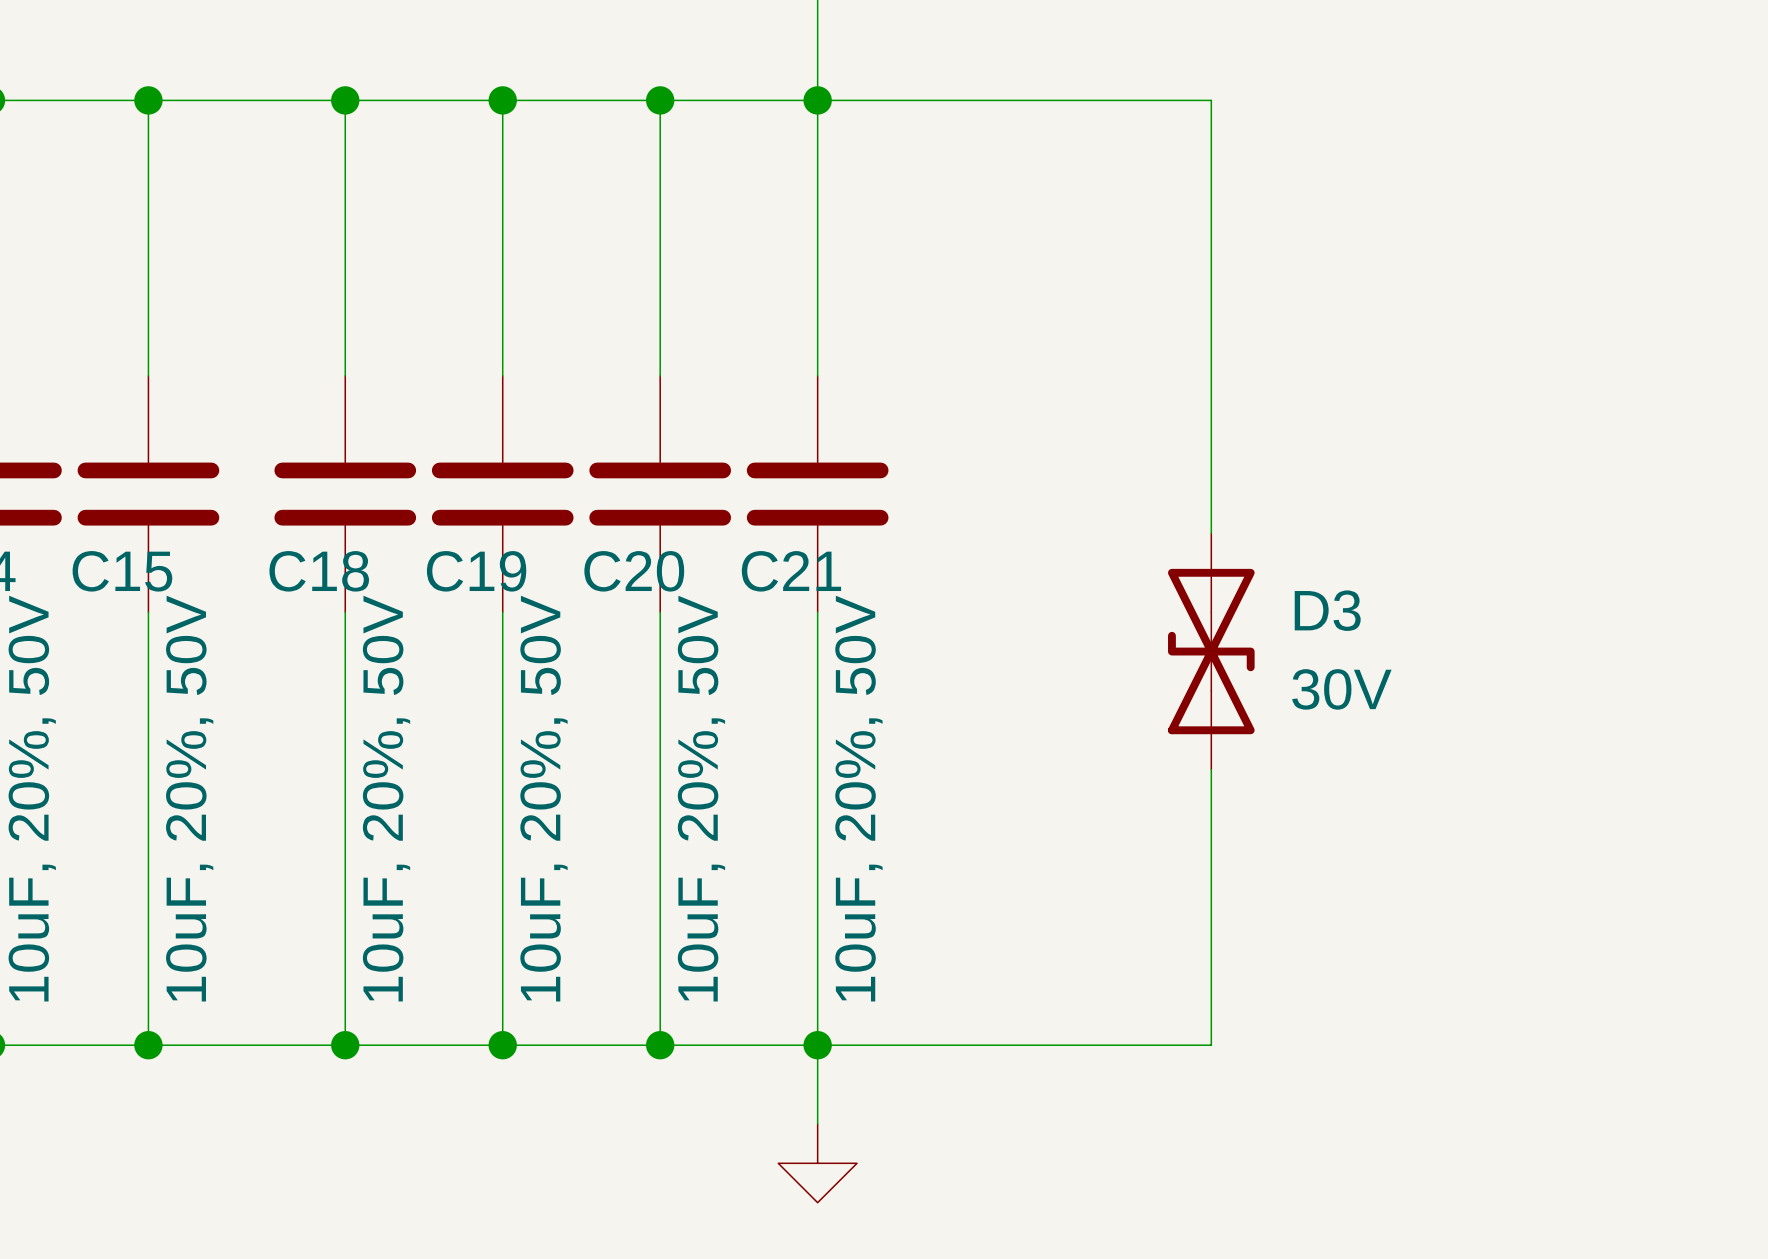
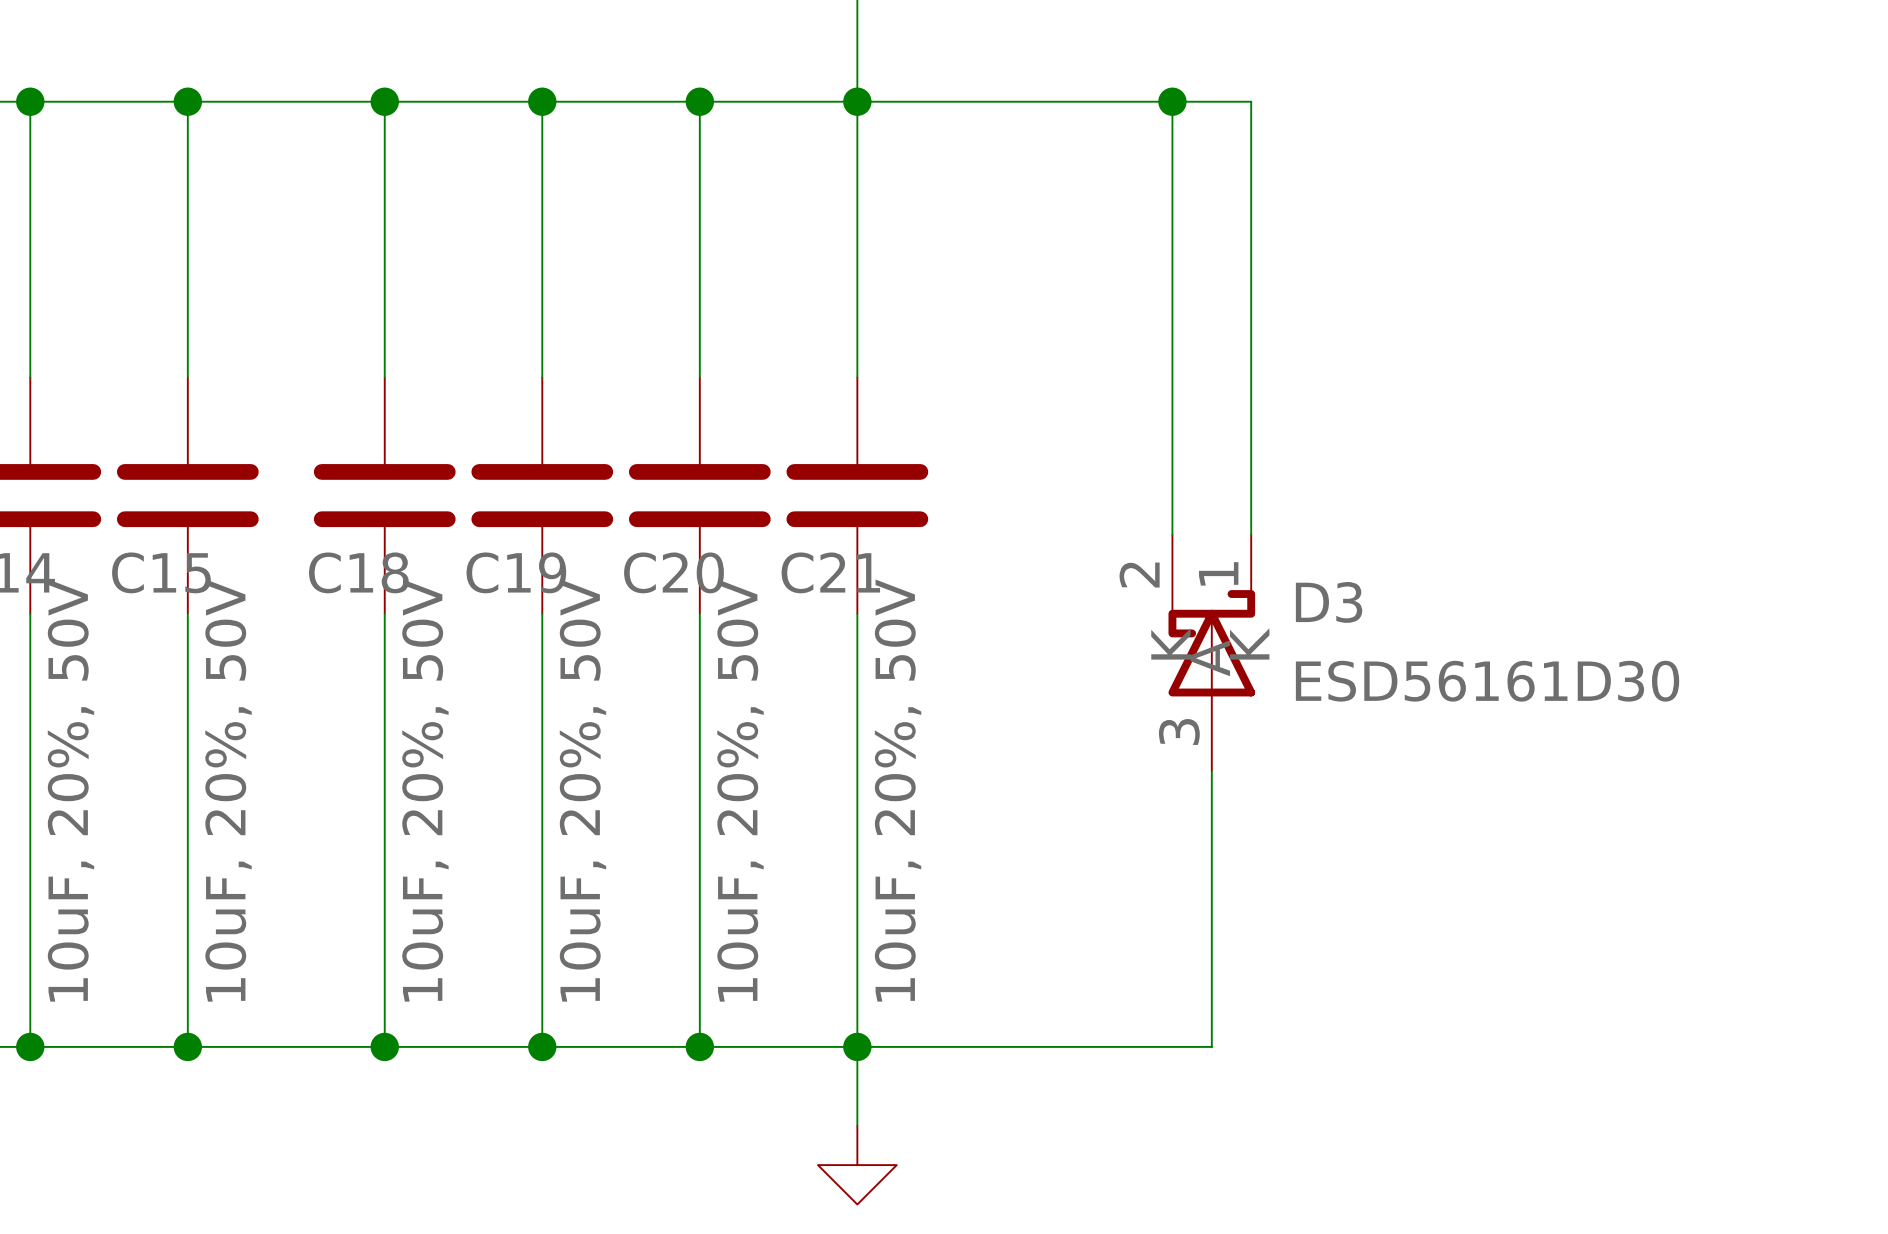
wire: none -> (1172, 101) (1172, 534)
junction: none -> (1172, 101)
D3 symbol: [1168, 533, 1255, 770] -> [1168, 534, 1256, 772]
D3 value: 30V (1341, 689) -> ESD56161D30 (1487, 681)
wire: (1211, 769) (1211, 1045) (1171, 1045) -> (1211, 771) (1211, 1046)

